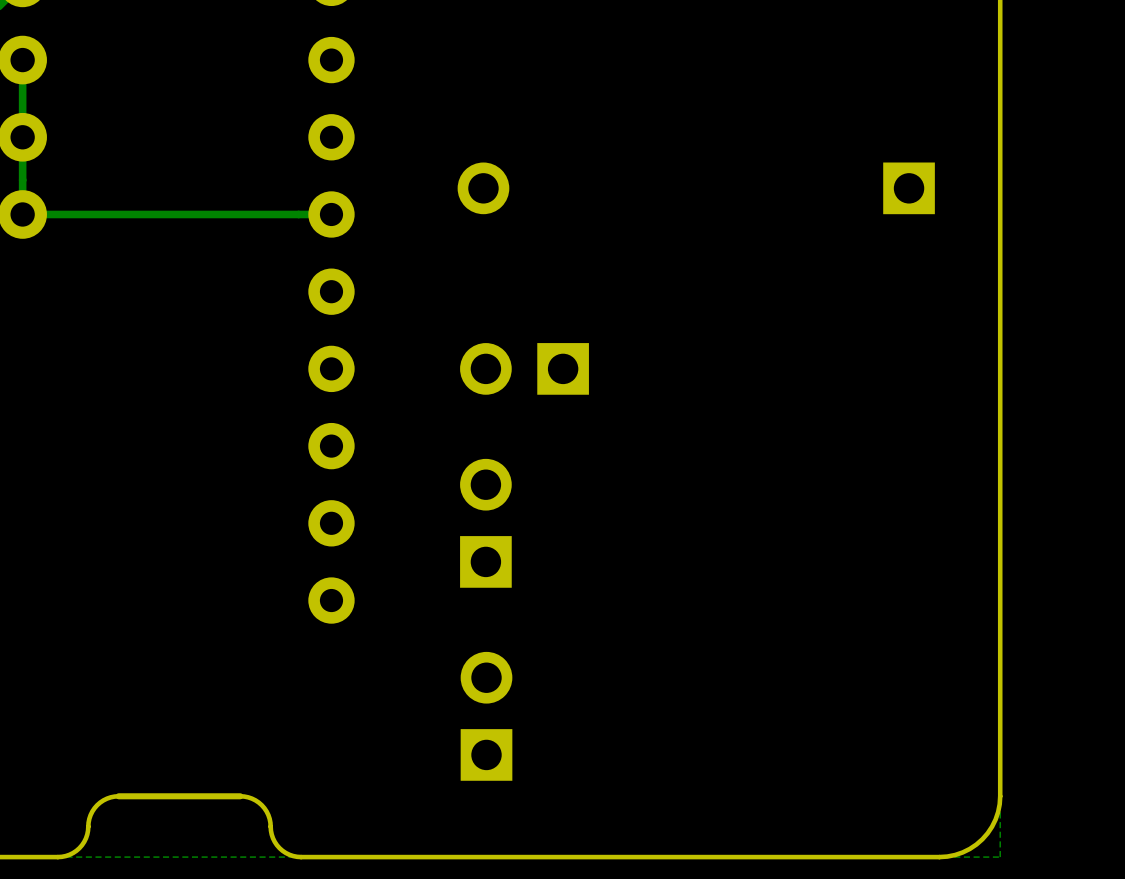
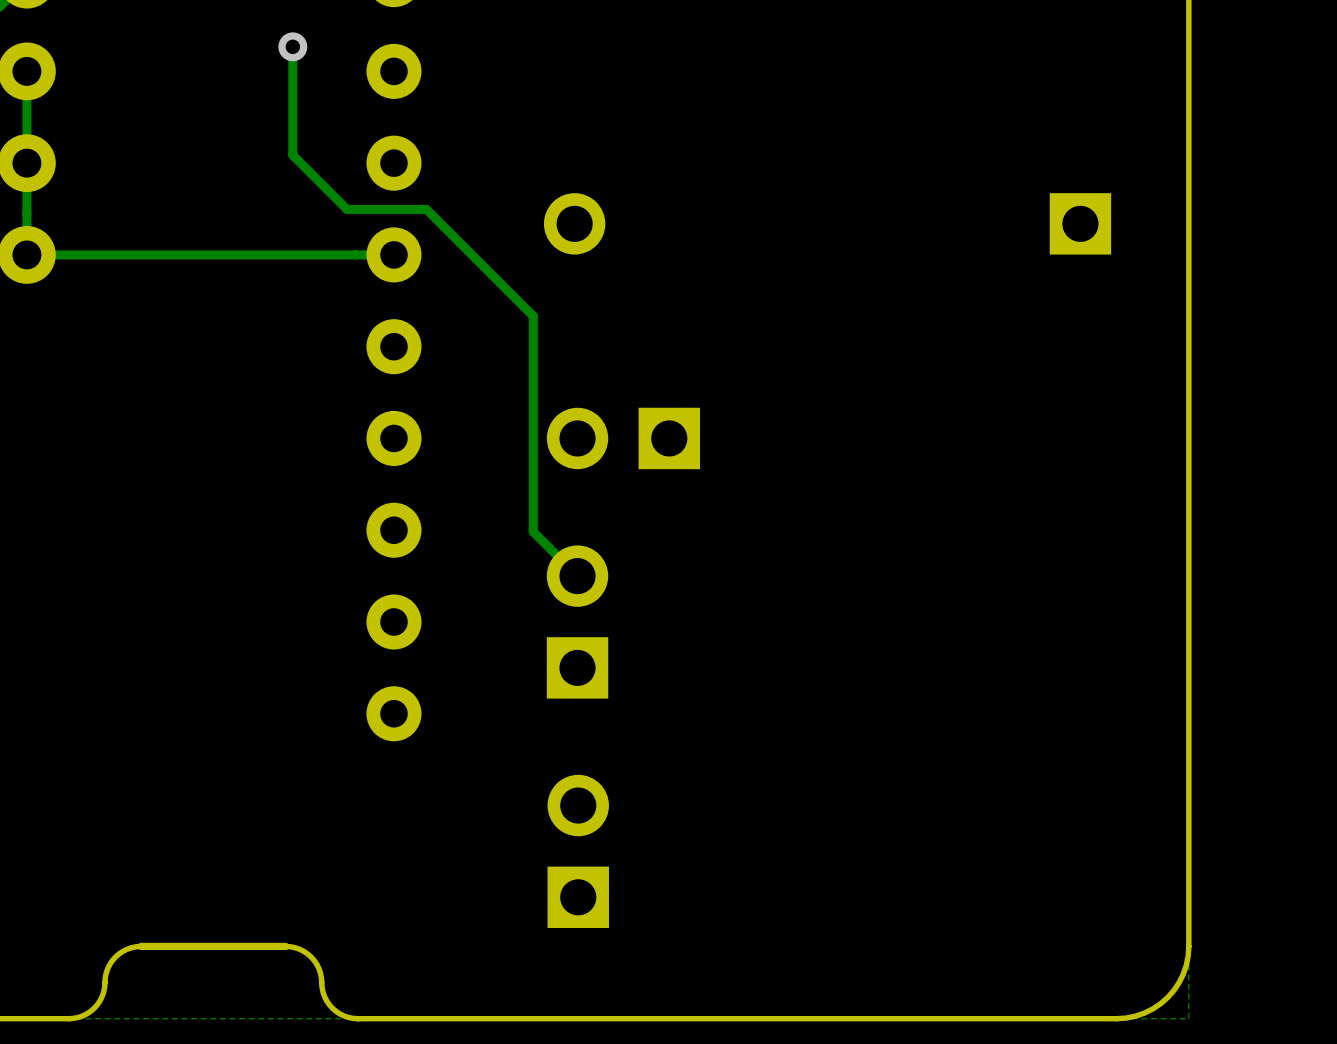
track: none -> (292, 46) (292, 155) (347, 209) (426, 209) (533, 316) (533, 531) (577, 576)
via: none -> (292, 46)

